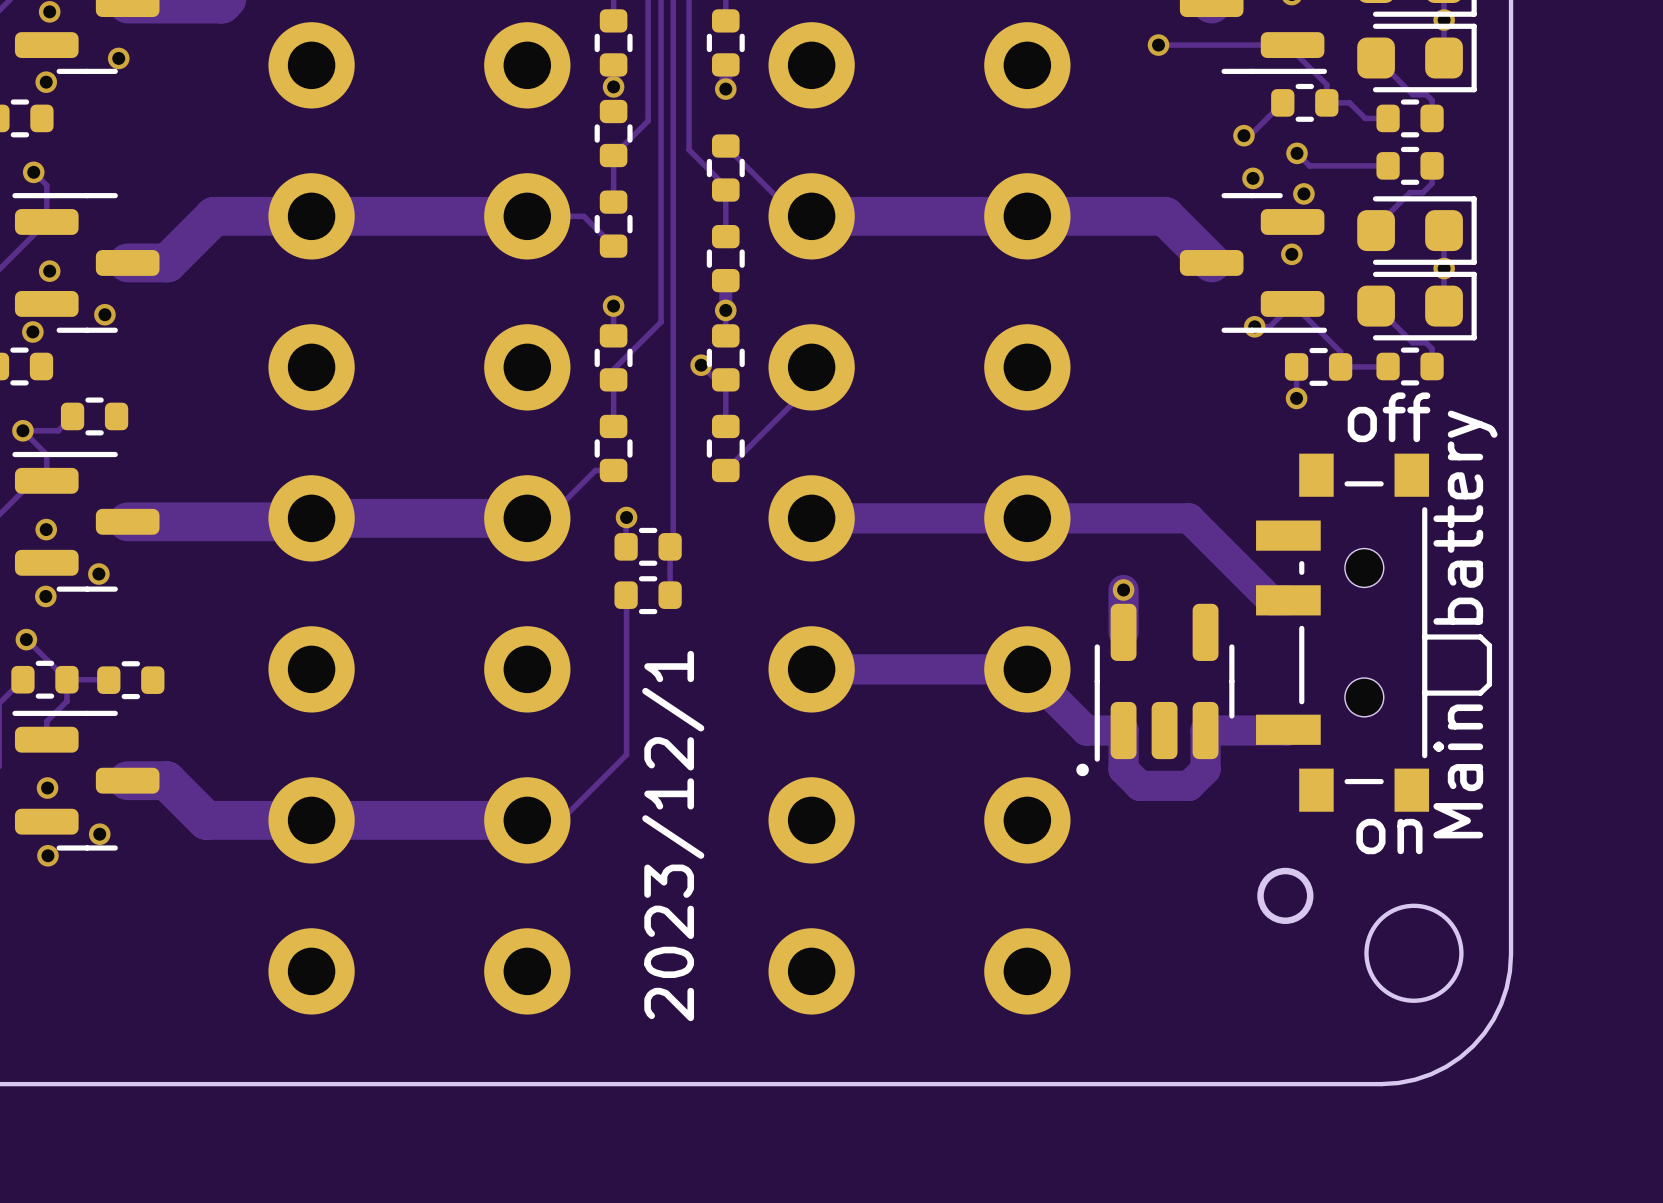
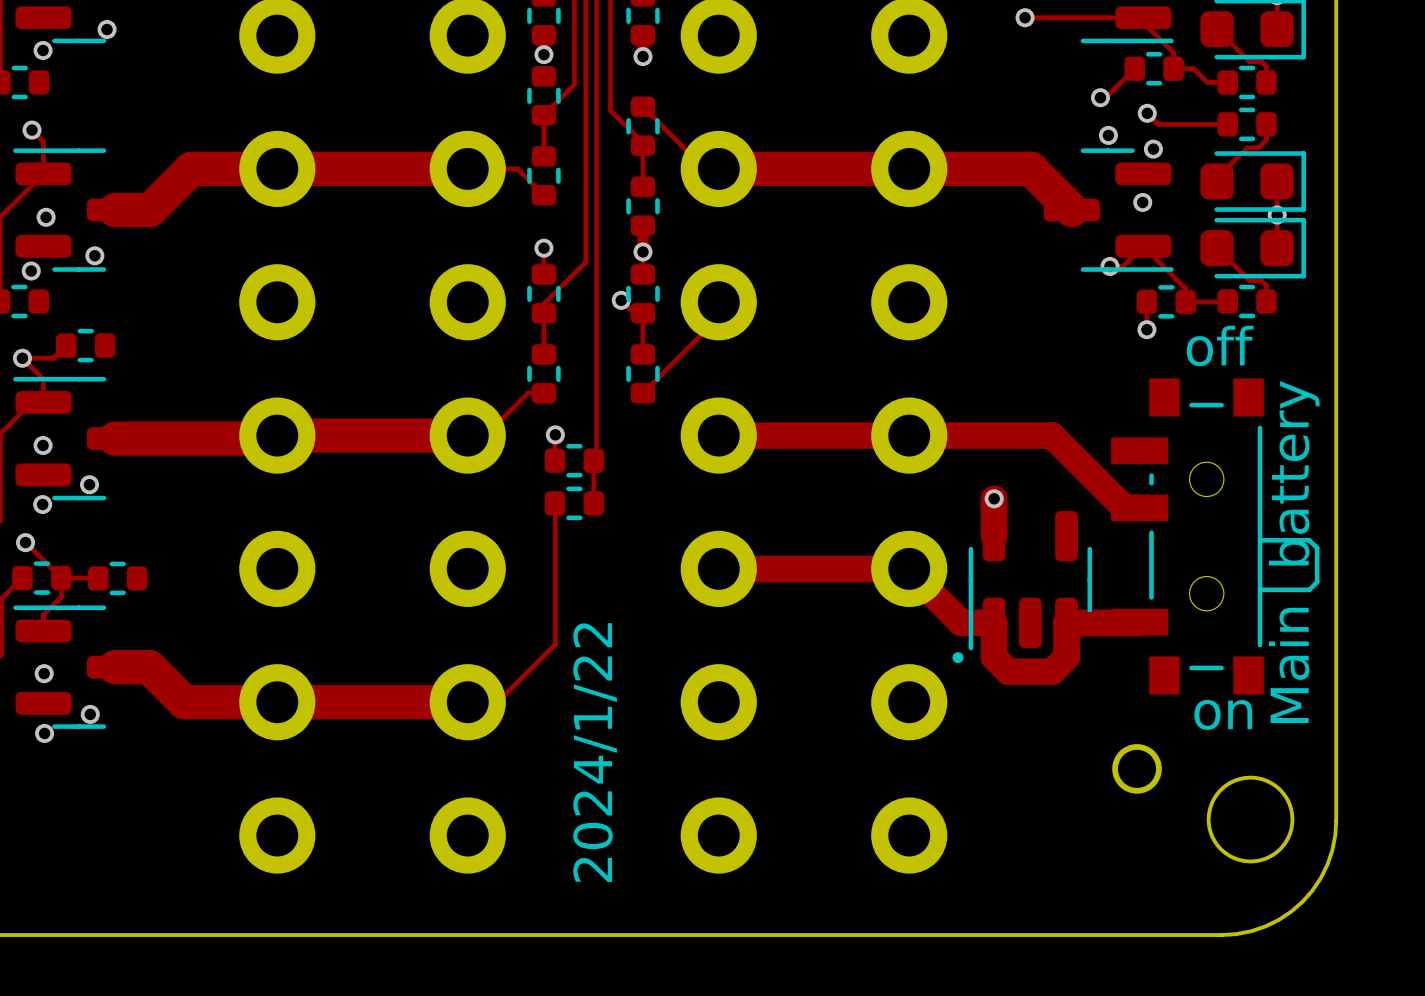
text: 2023/12/1 (673, 836) -> 2024/1/22 (595, 752)

